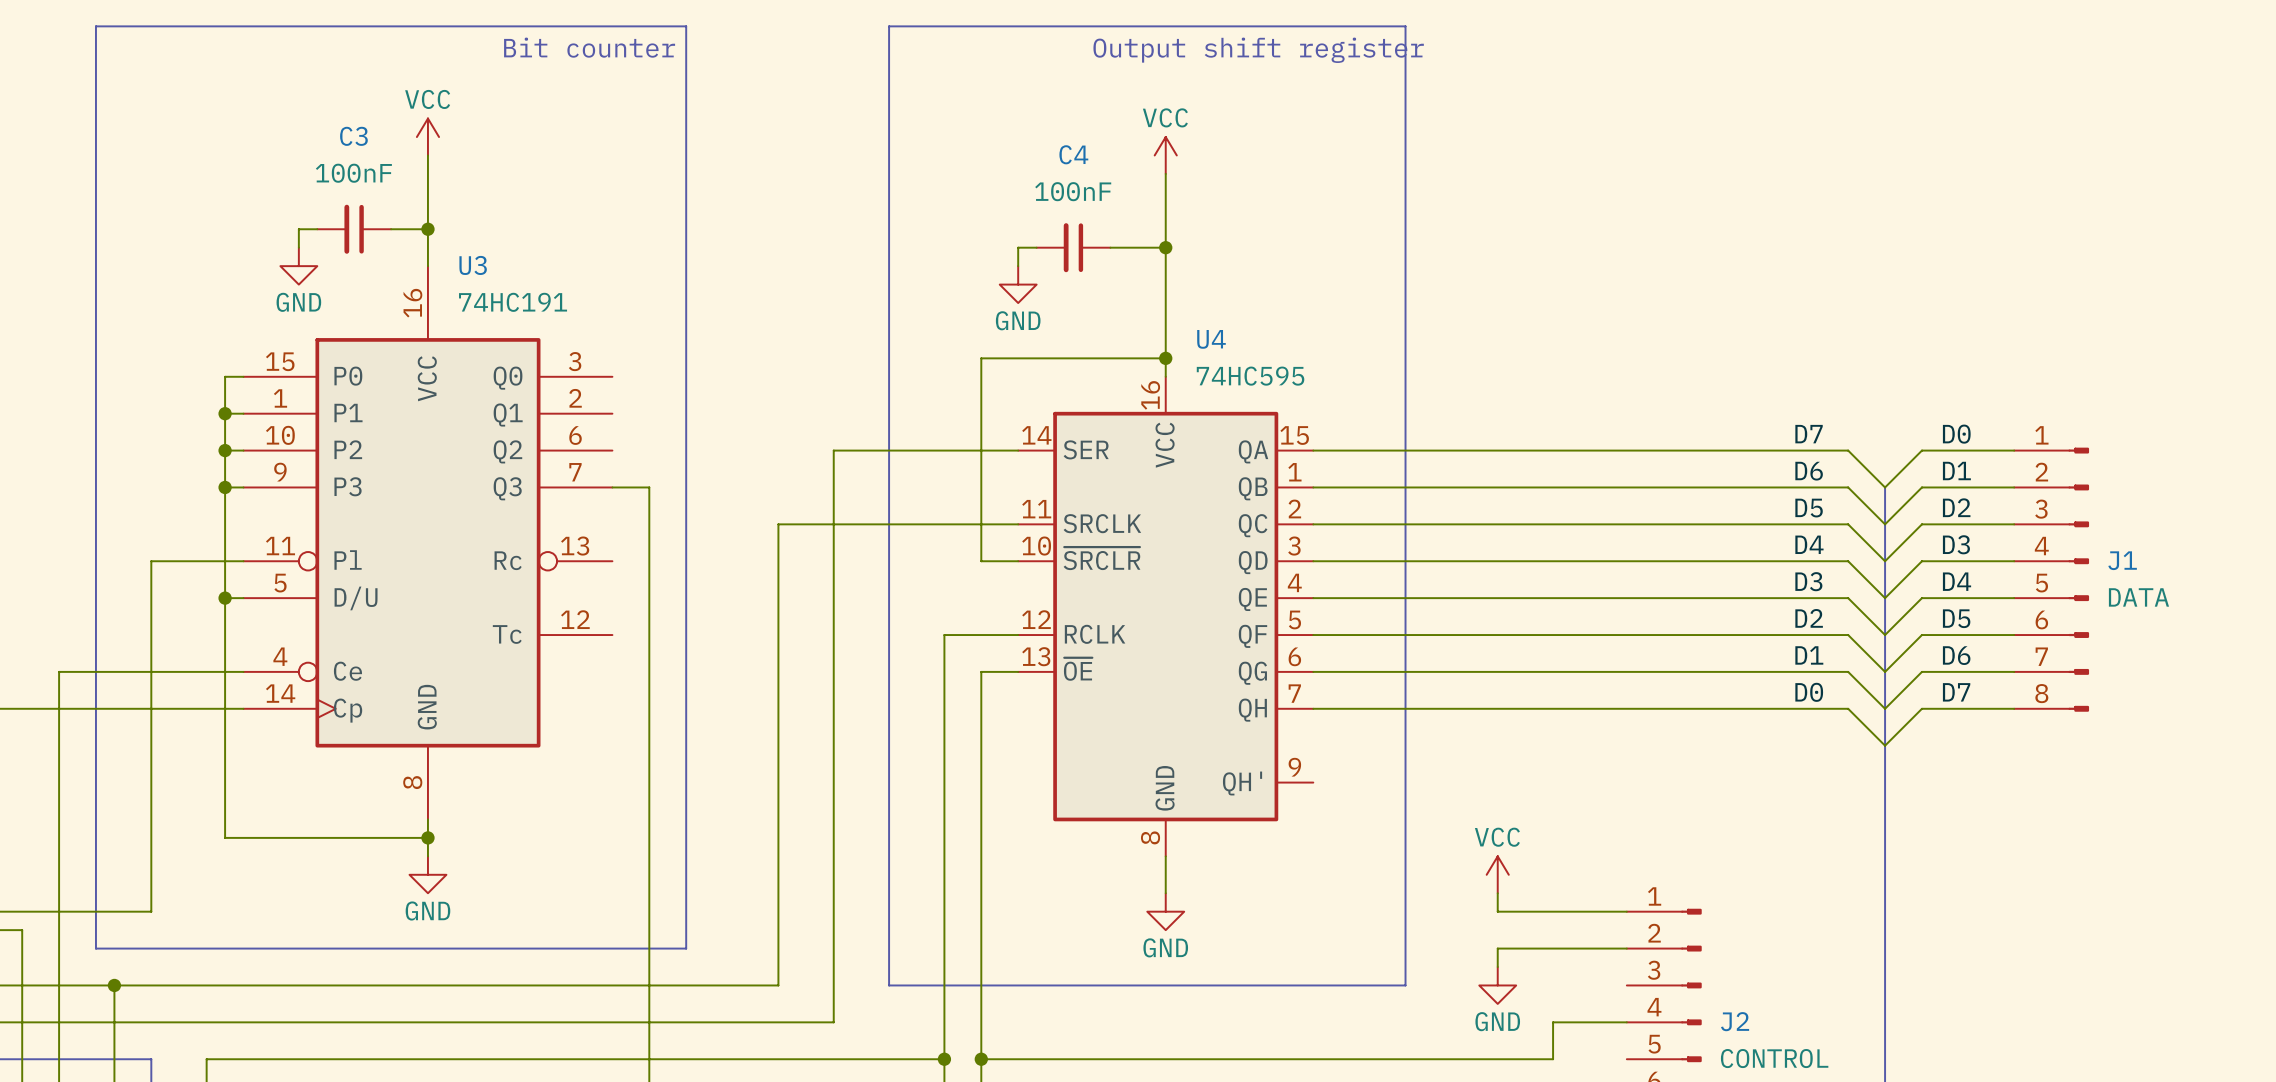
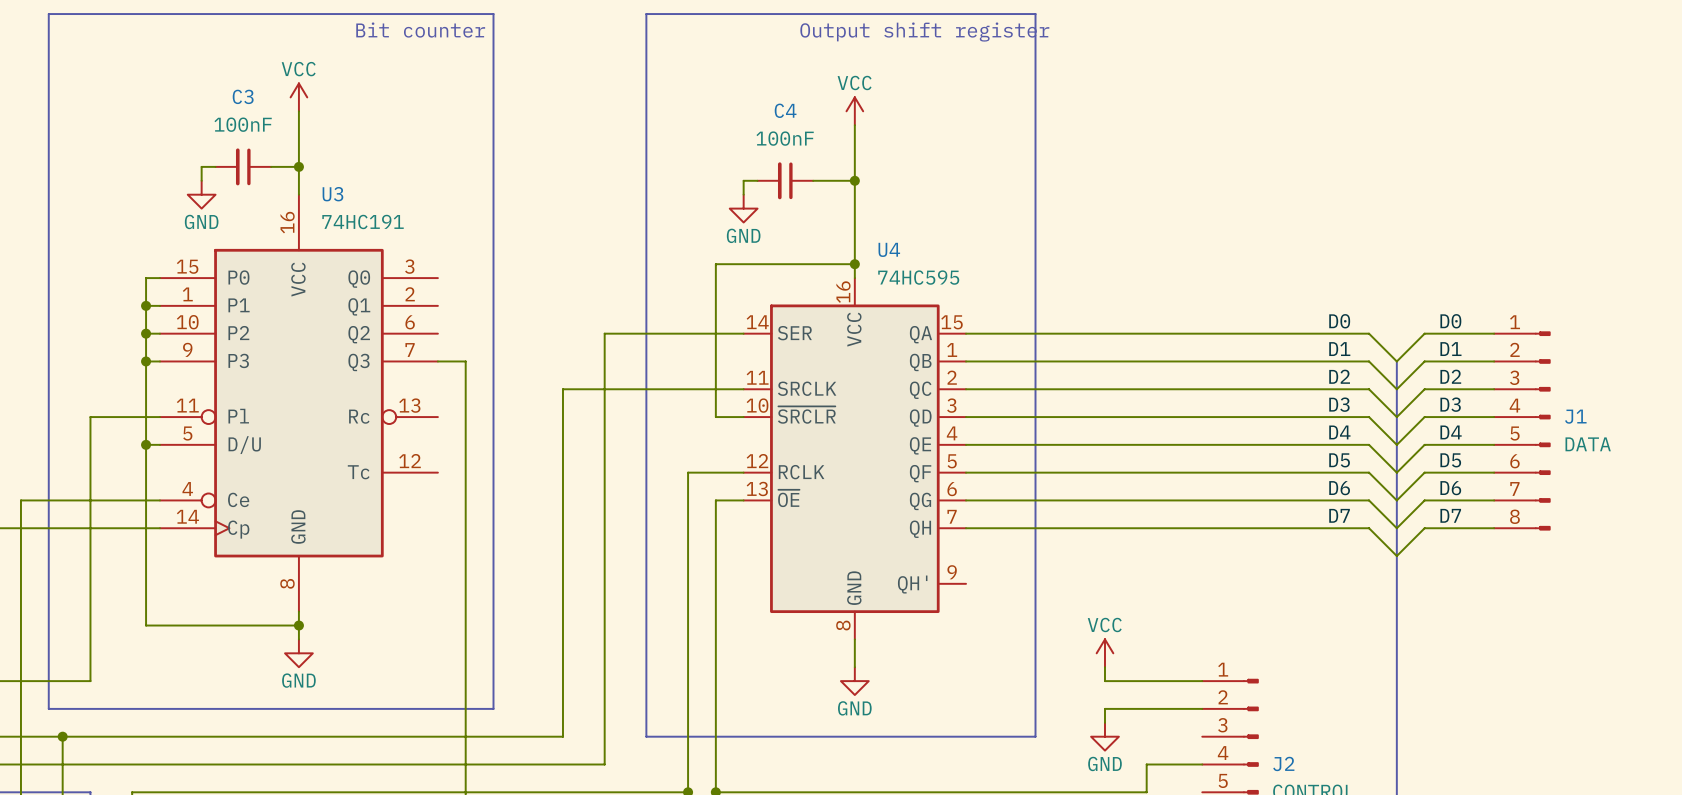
label: D7 (1809, 434) -> D0 (1339, 321)
label: D6 (1809, 471) -> D1 (1339, 349)
label: D5 (1809, 508) -> D2 (1339, 376)
label: D4 (1809, 544) -> D3 (1339, 404)
label: D3 (1808, 581) -> D4 (1339, 432)
label: D2 (1809, 618) -> D5 (1339, 460)
label: D1 (1809, 655) -> D6 (1339, 488)
label: D0 (1809, 692) -> D7 (1339, 515)

